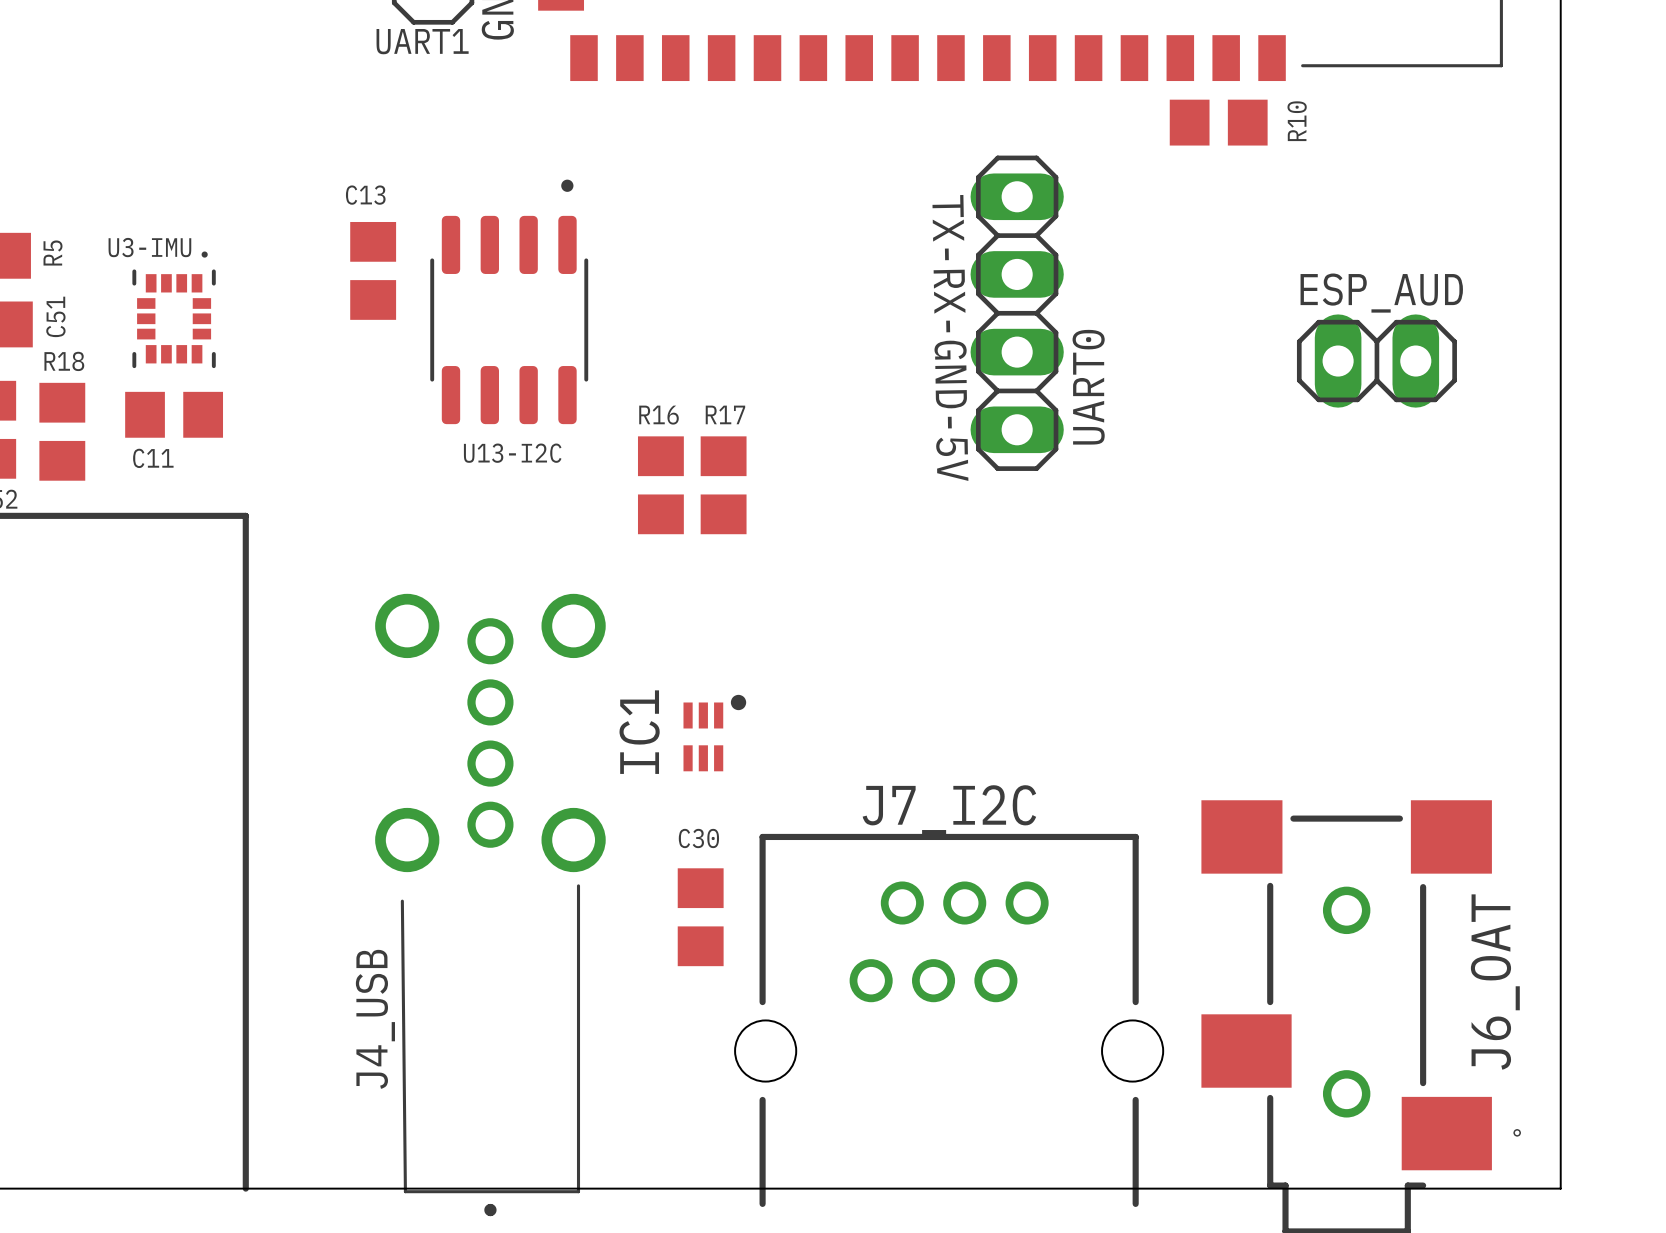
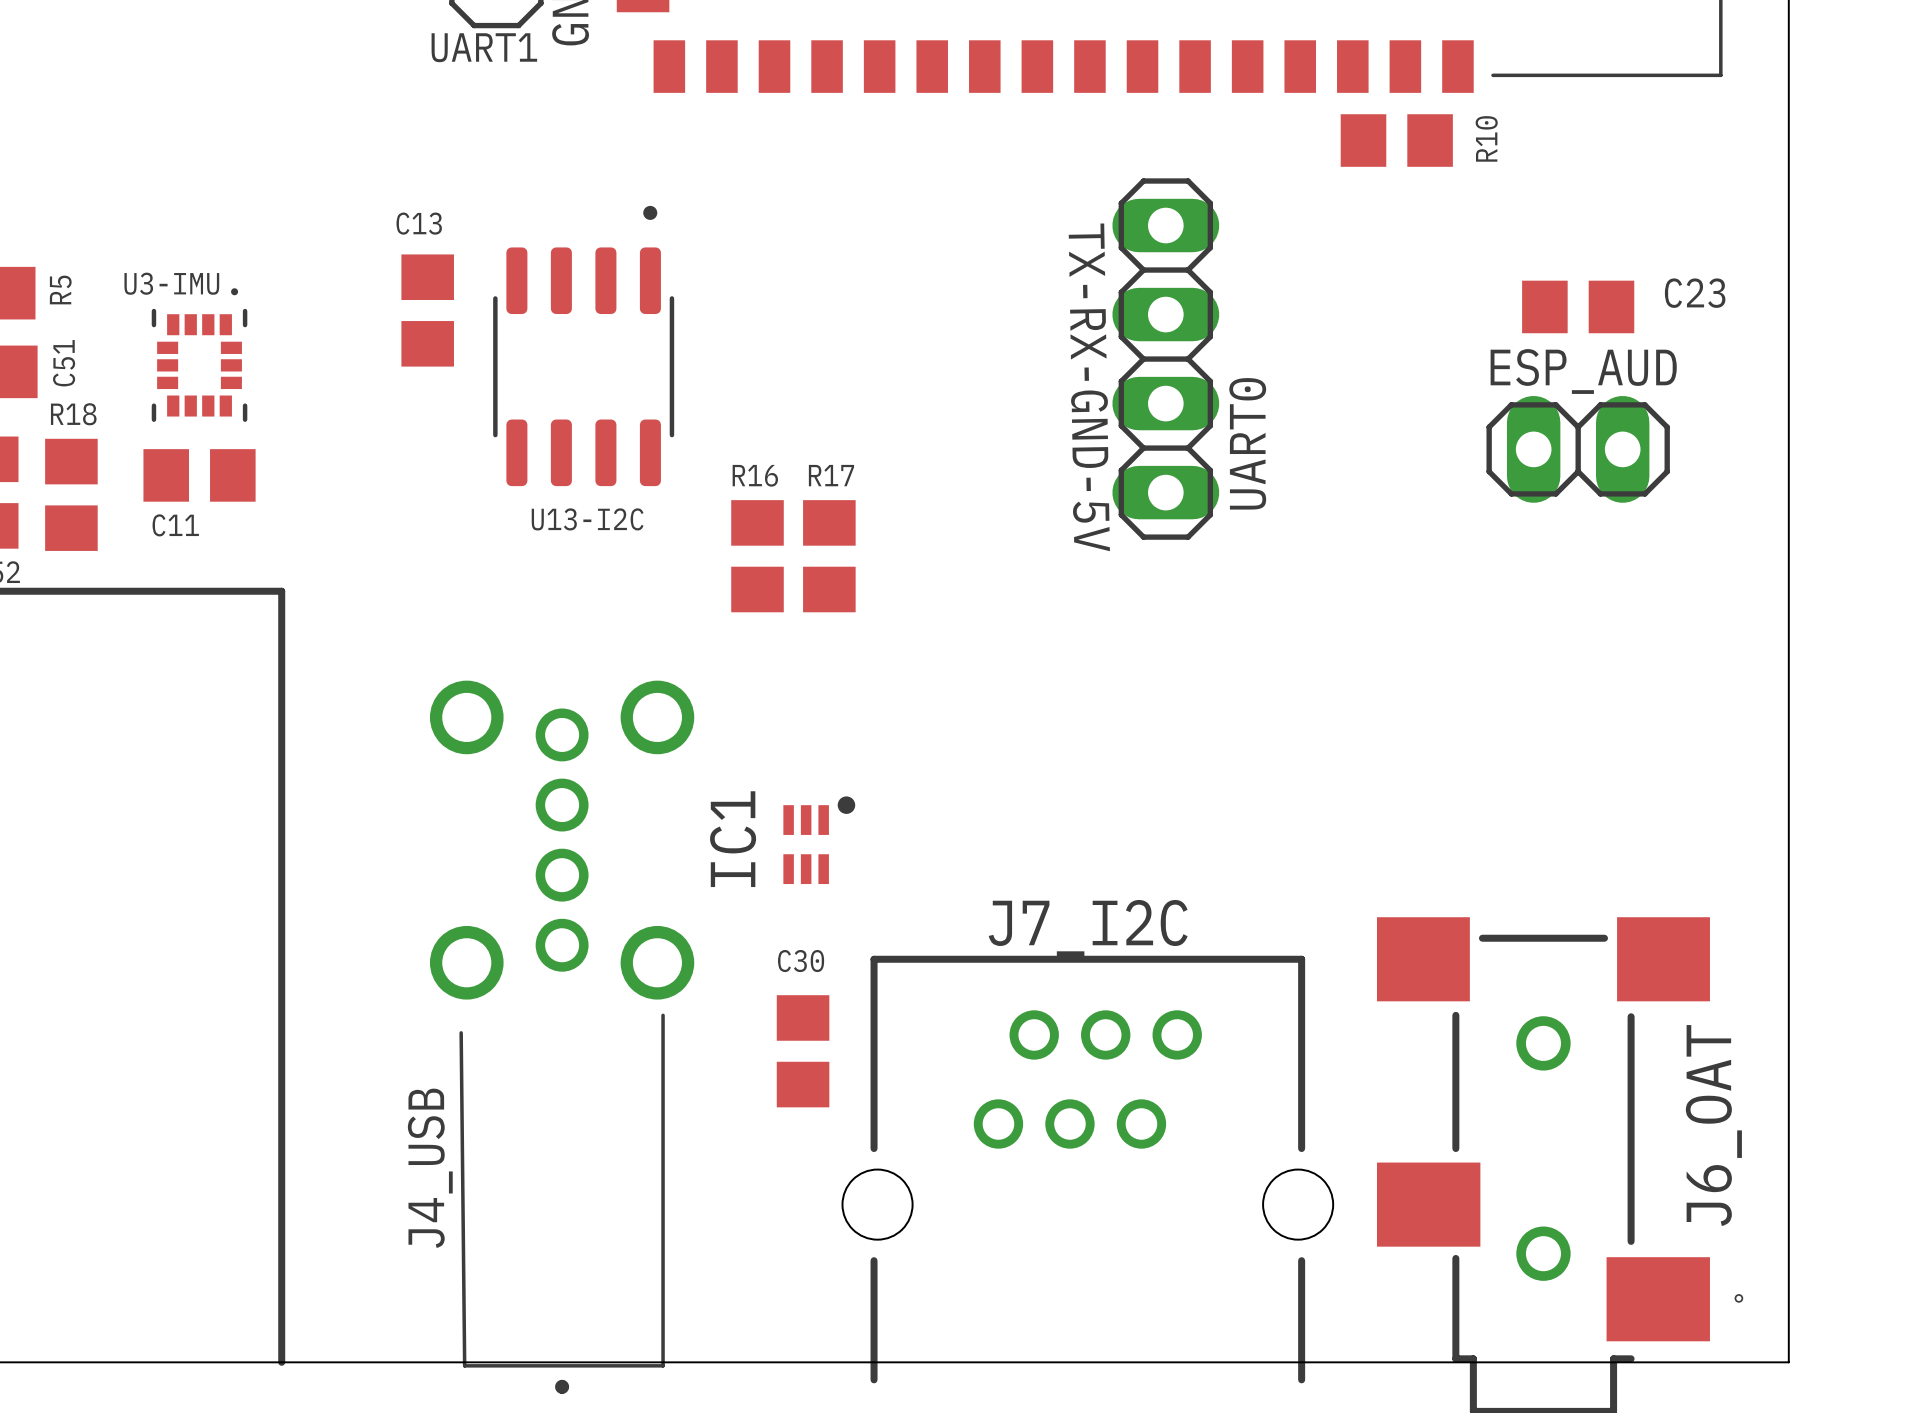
C23: none -> (1578, 306)
ESP_AUD position: (1376, 361) -> (1578, 449)

